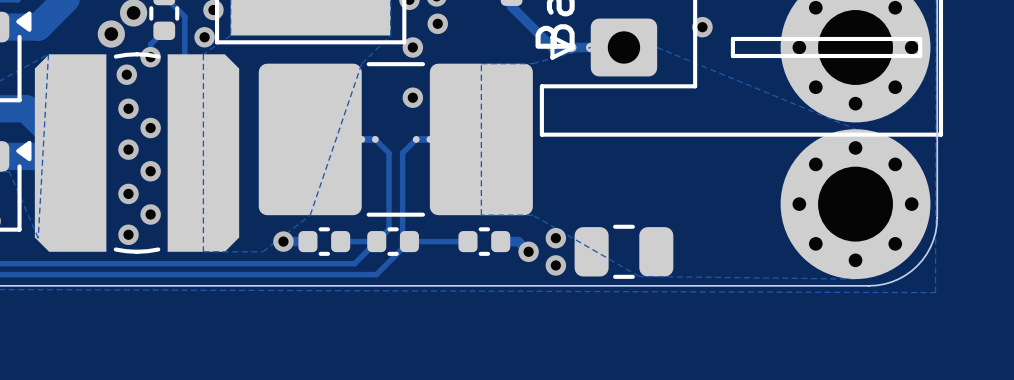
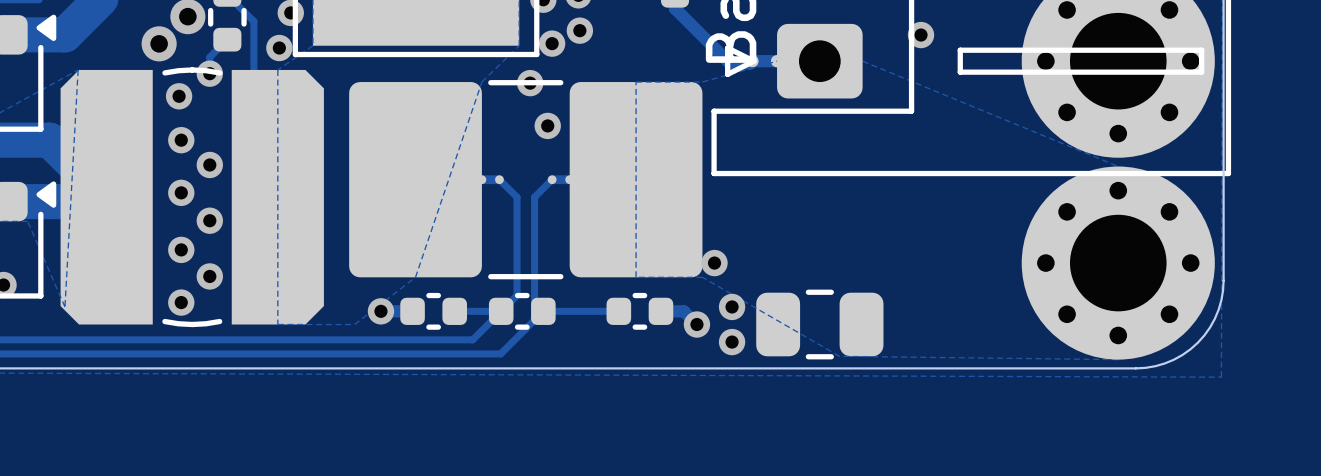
via: none -> (552, 43)
via: (412, 47) -> none
via: none -> (530, 83)
via: none -> (714, 263)

